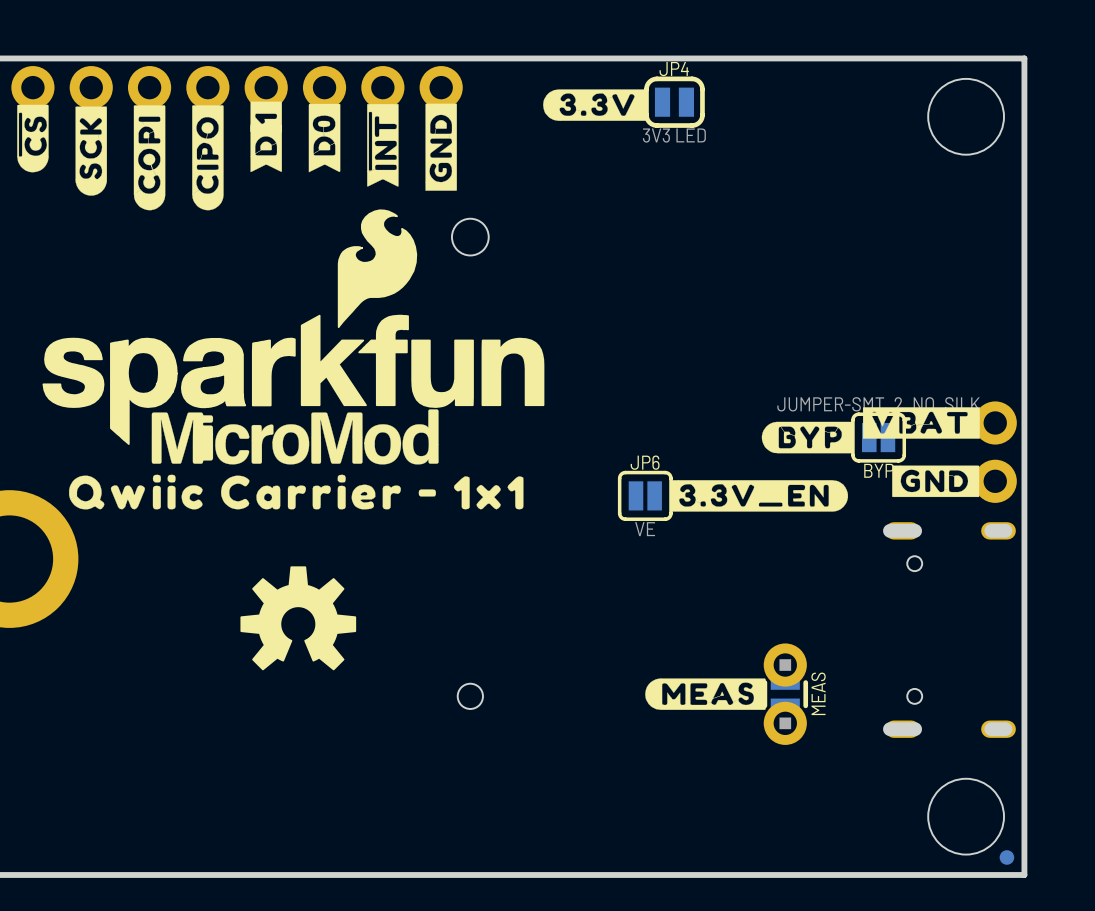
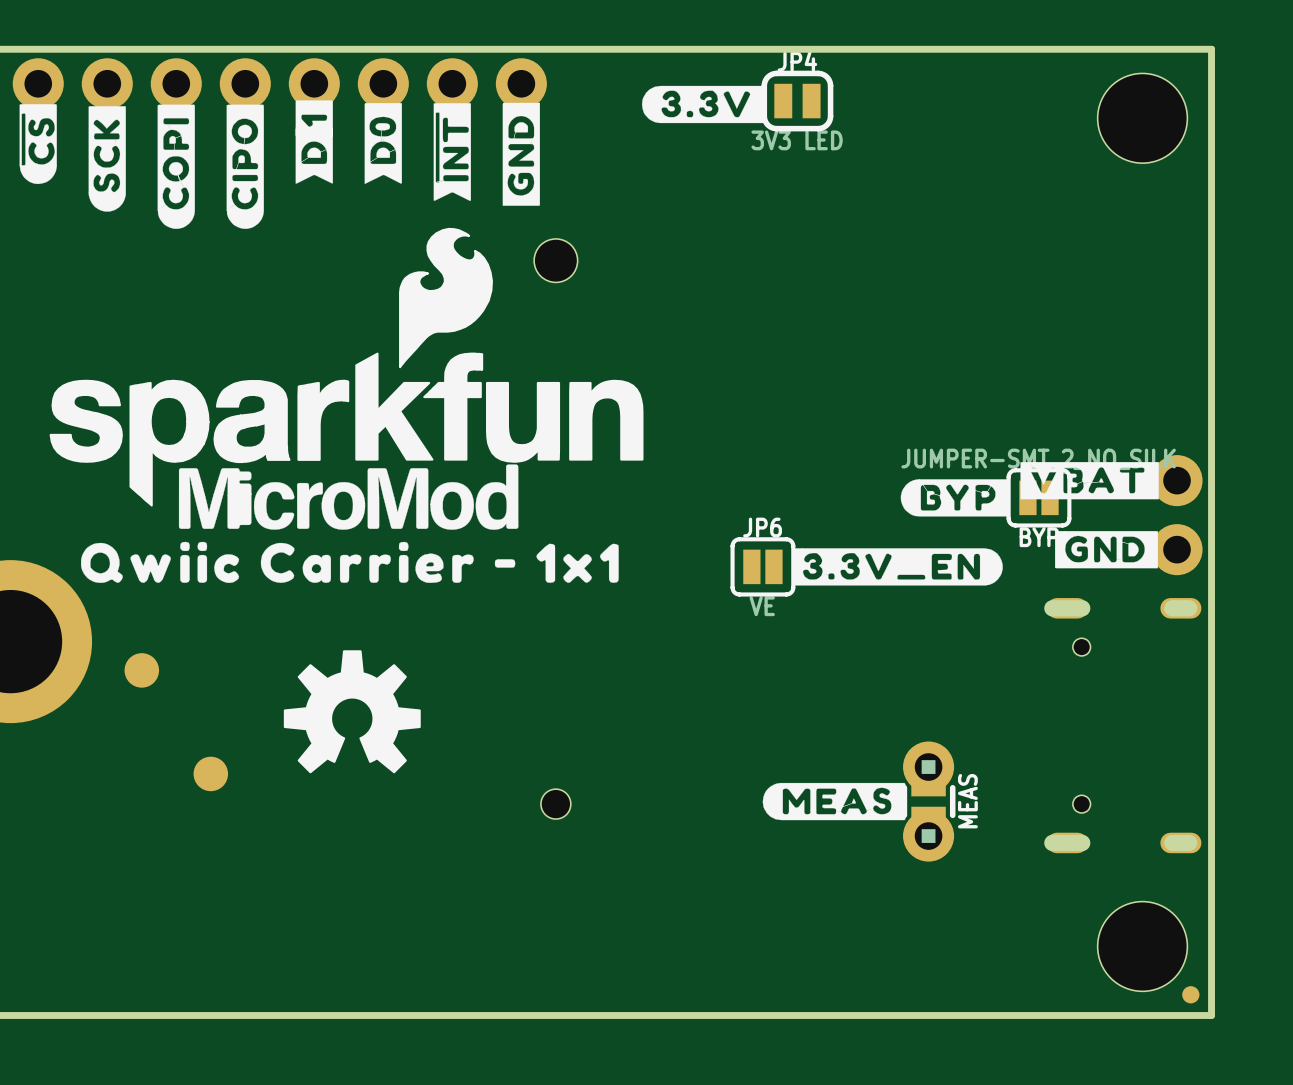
part: none -> (141, 670)
part: none -> (210, 773)

